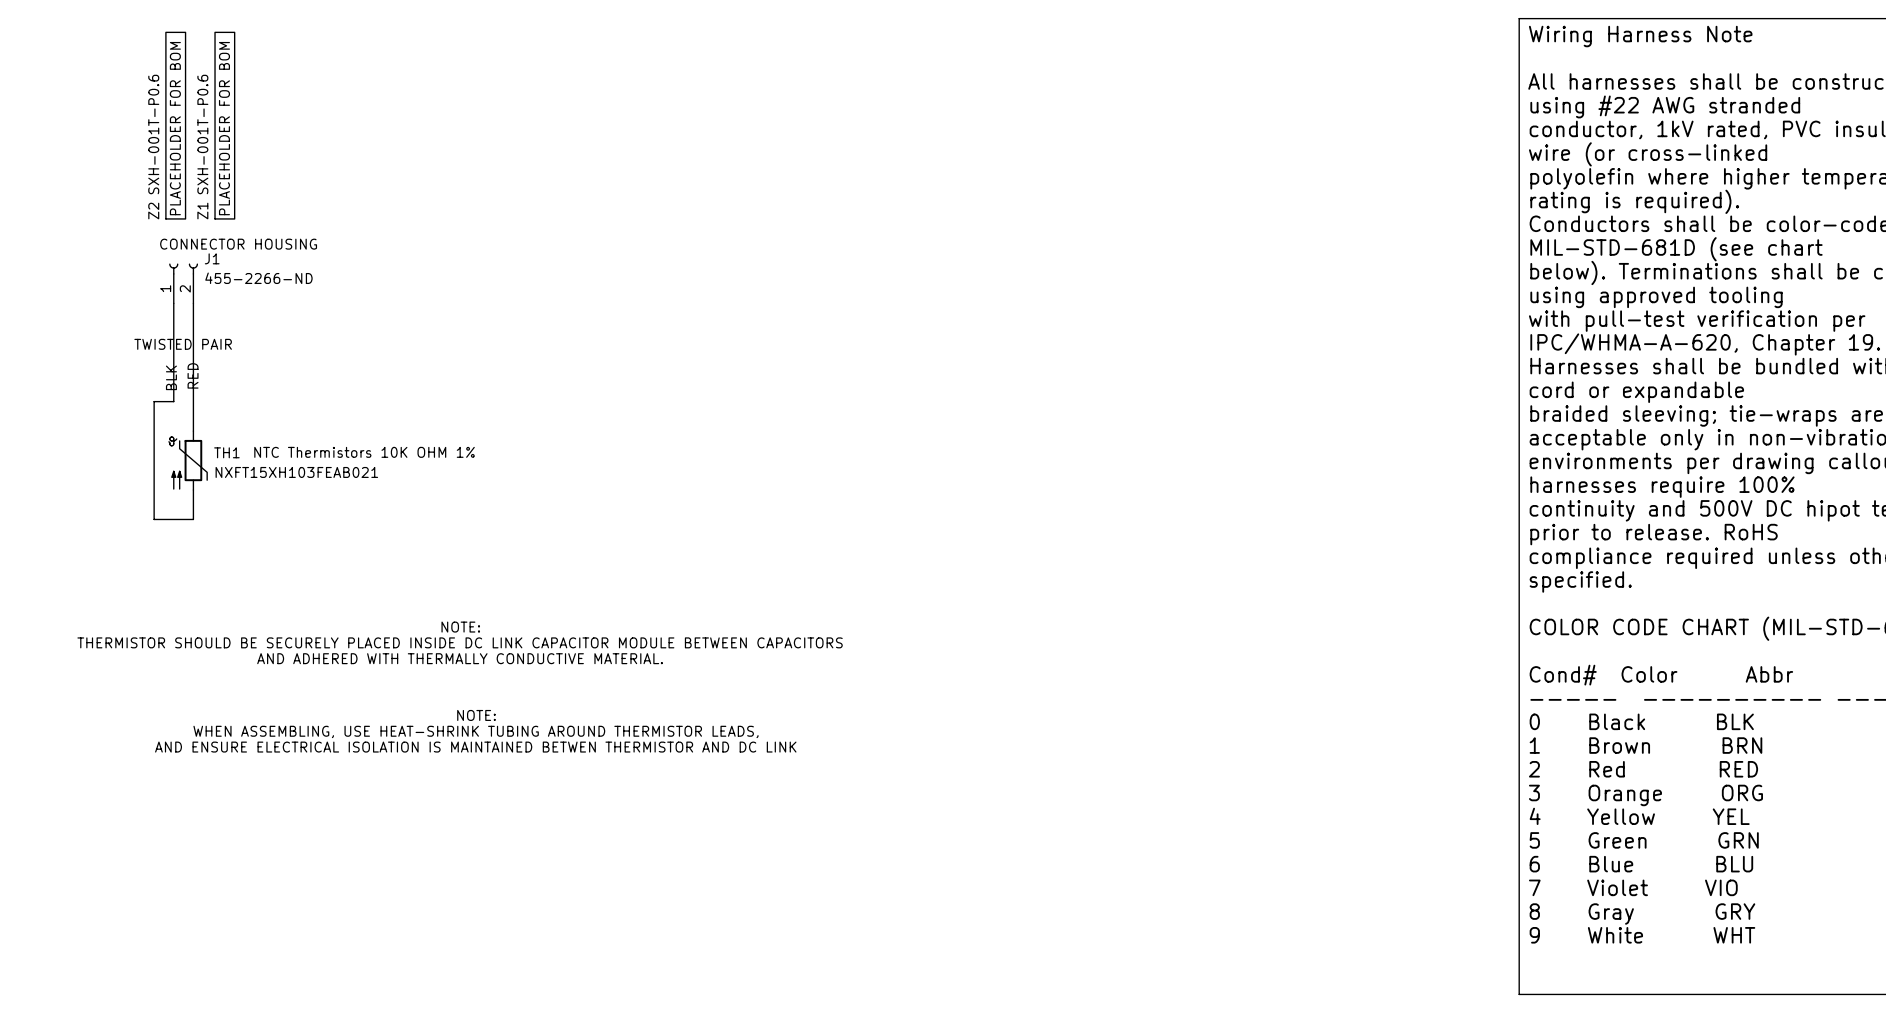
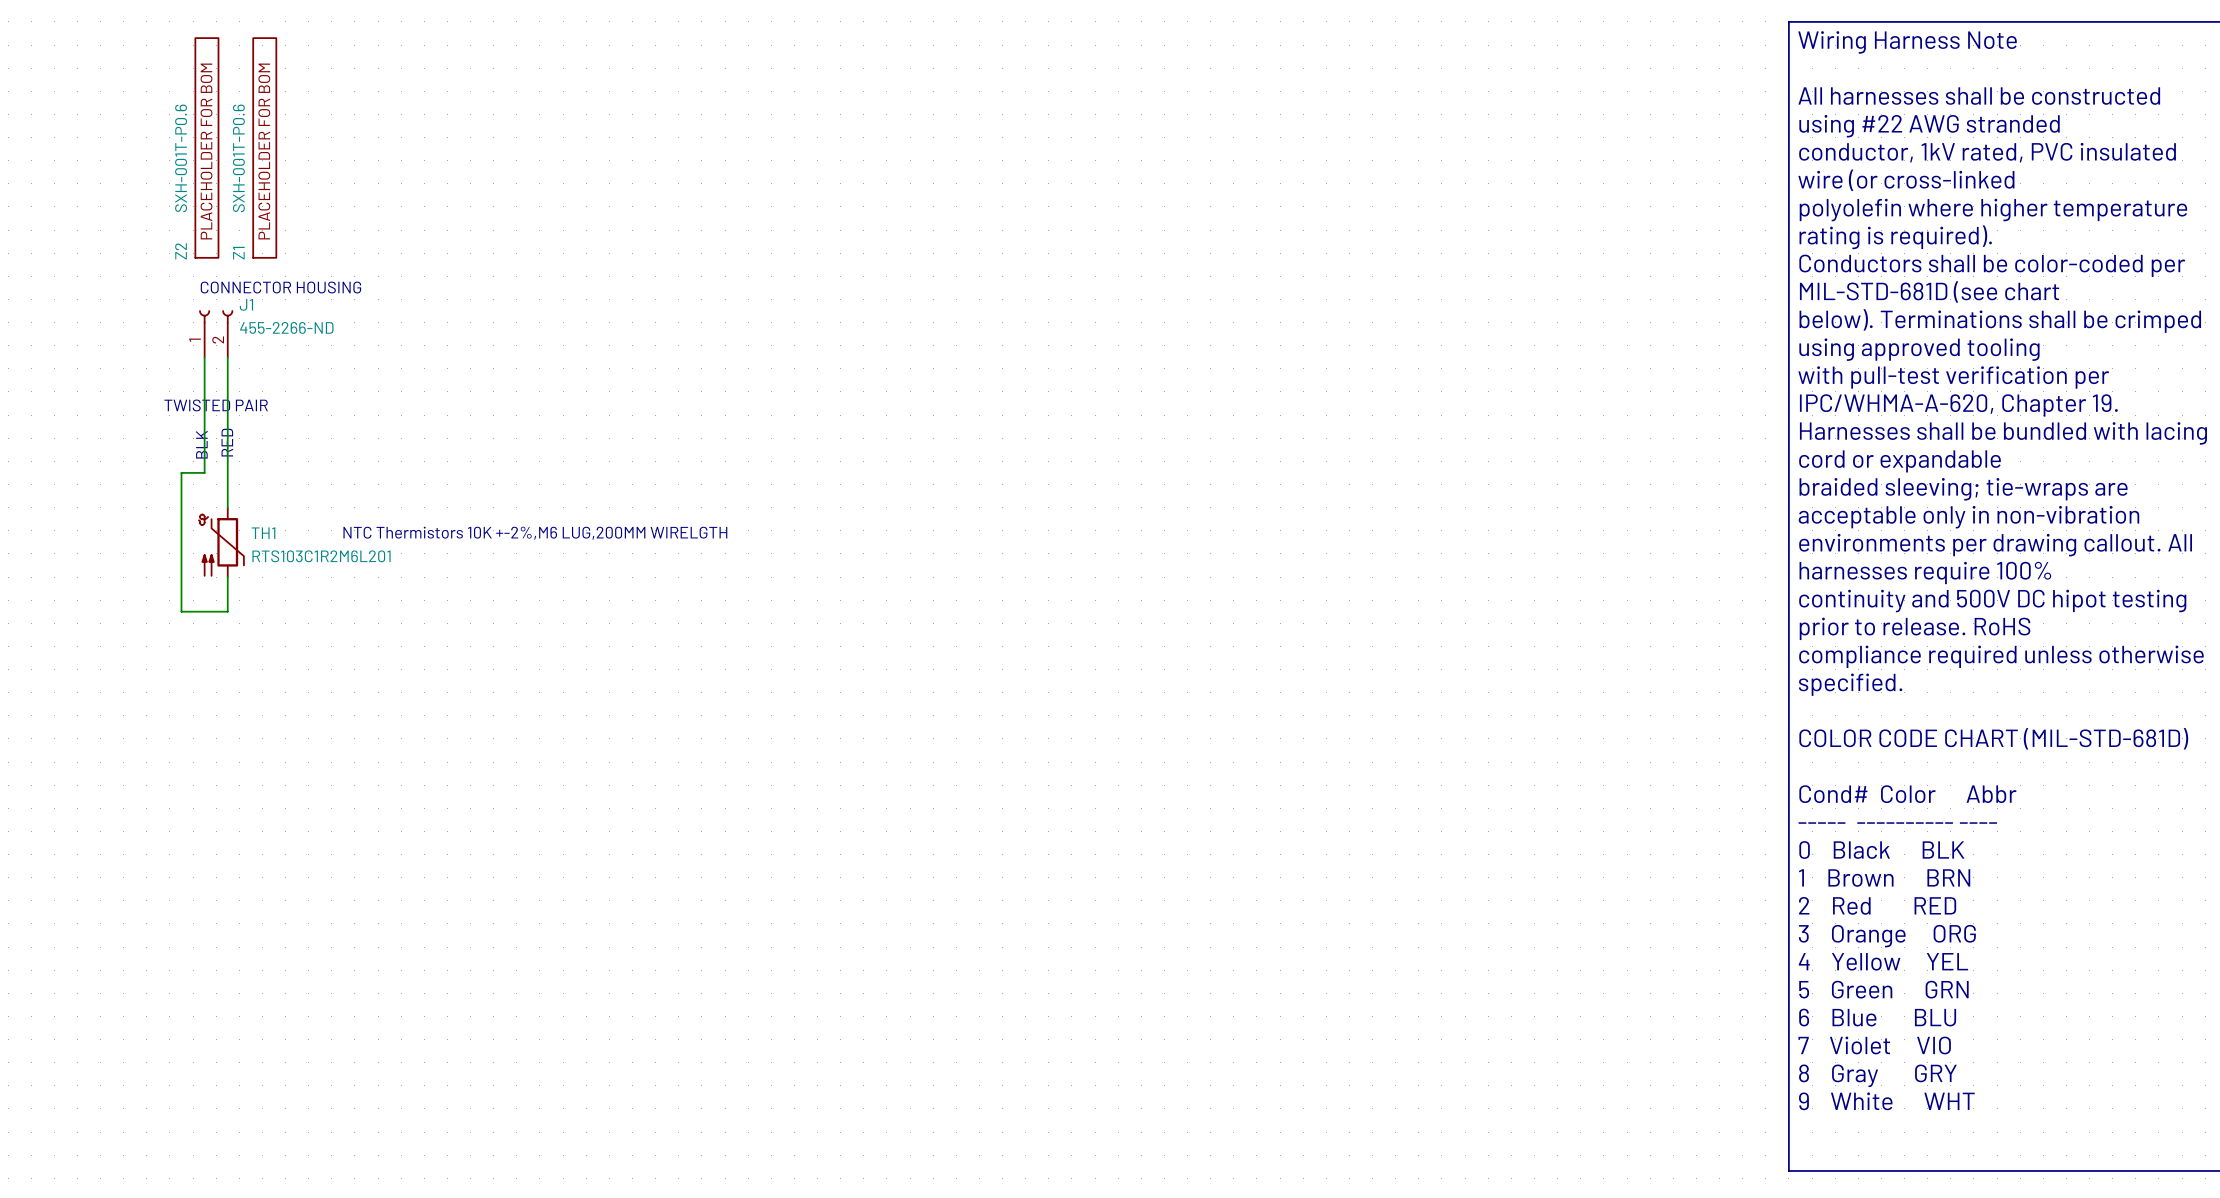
text: NTC Thermistors 10K OHM 1% (364, 452) -> NTC Thermistors 10K +-2%,M6 LUG,200MM WIRELGTH (535, 533)
TH1 value: NXFT15XH103FEAB021 (296, 472) -> RTS103C1R2M6L201 (321, 556)
text: NOTE: (460, 627) -> none
text: THERMISTOR SHOULD BE SECURELY PLACED INSIDE DC LINK CAPACITOR MODULE BETWEEN CAPACITORS (460, 642) -> none
text: AND ADHERED WITH THERMALLY CONDUCTIVE MATERIAL. (460, 658) -> none
text: NOTE: (476, 715) -> none
text: WHEN ASSEMBLING, USE HEAT-SHRINK TUBING AROUND THERMISTOR LEADS, (476, 731) -> none
text: AND ENSURE ELECTRICAL ISOLATION IS MAINTAINED BETWEN THERMISTOR AND DC LINK (475, 747) -> none

